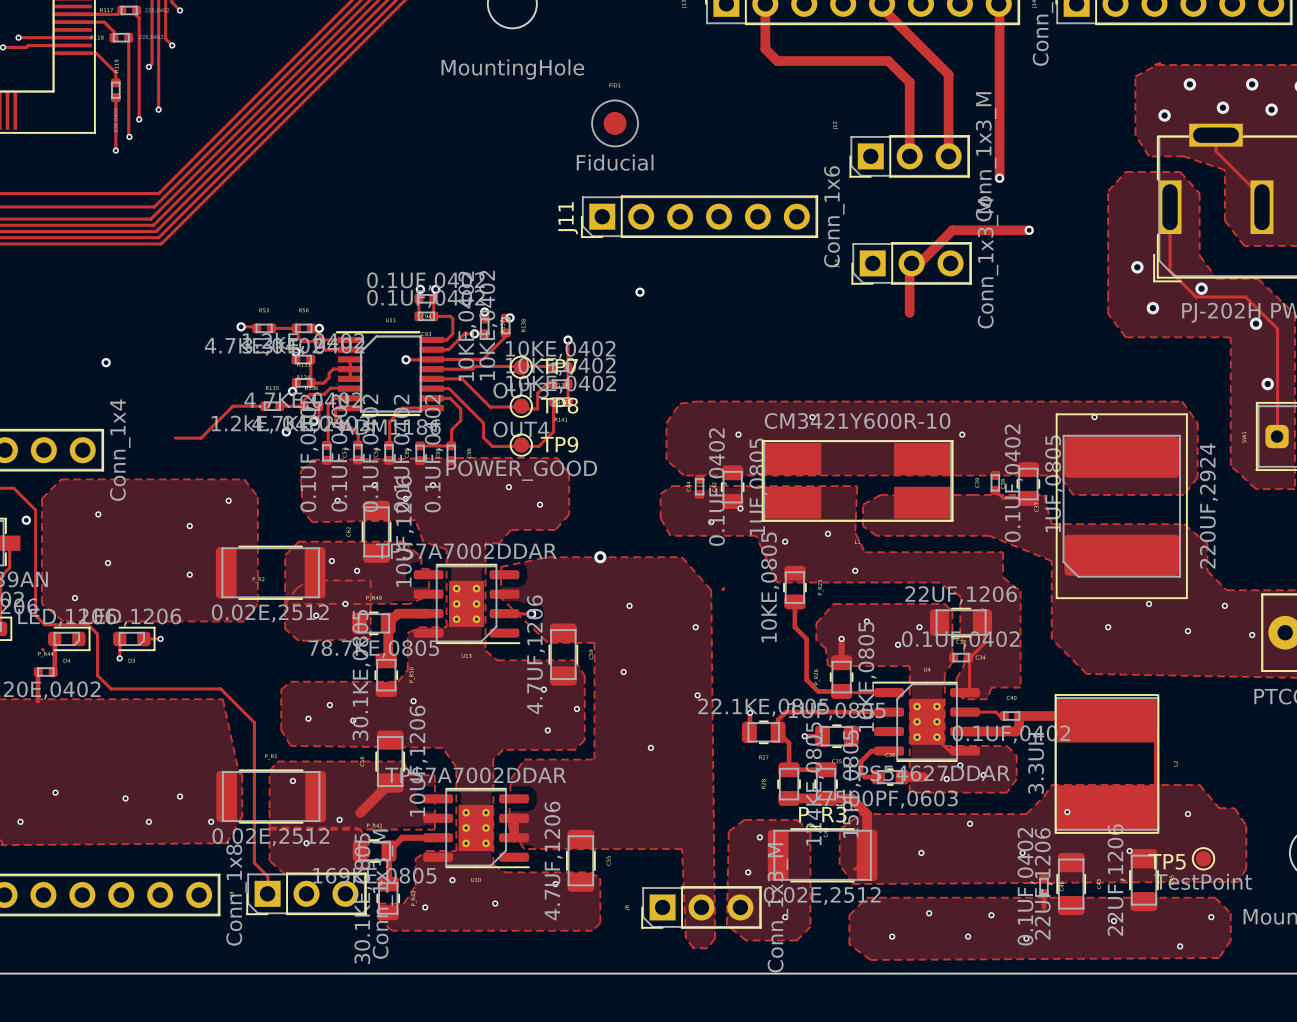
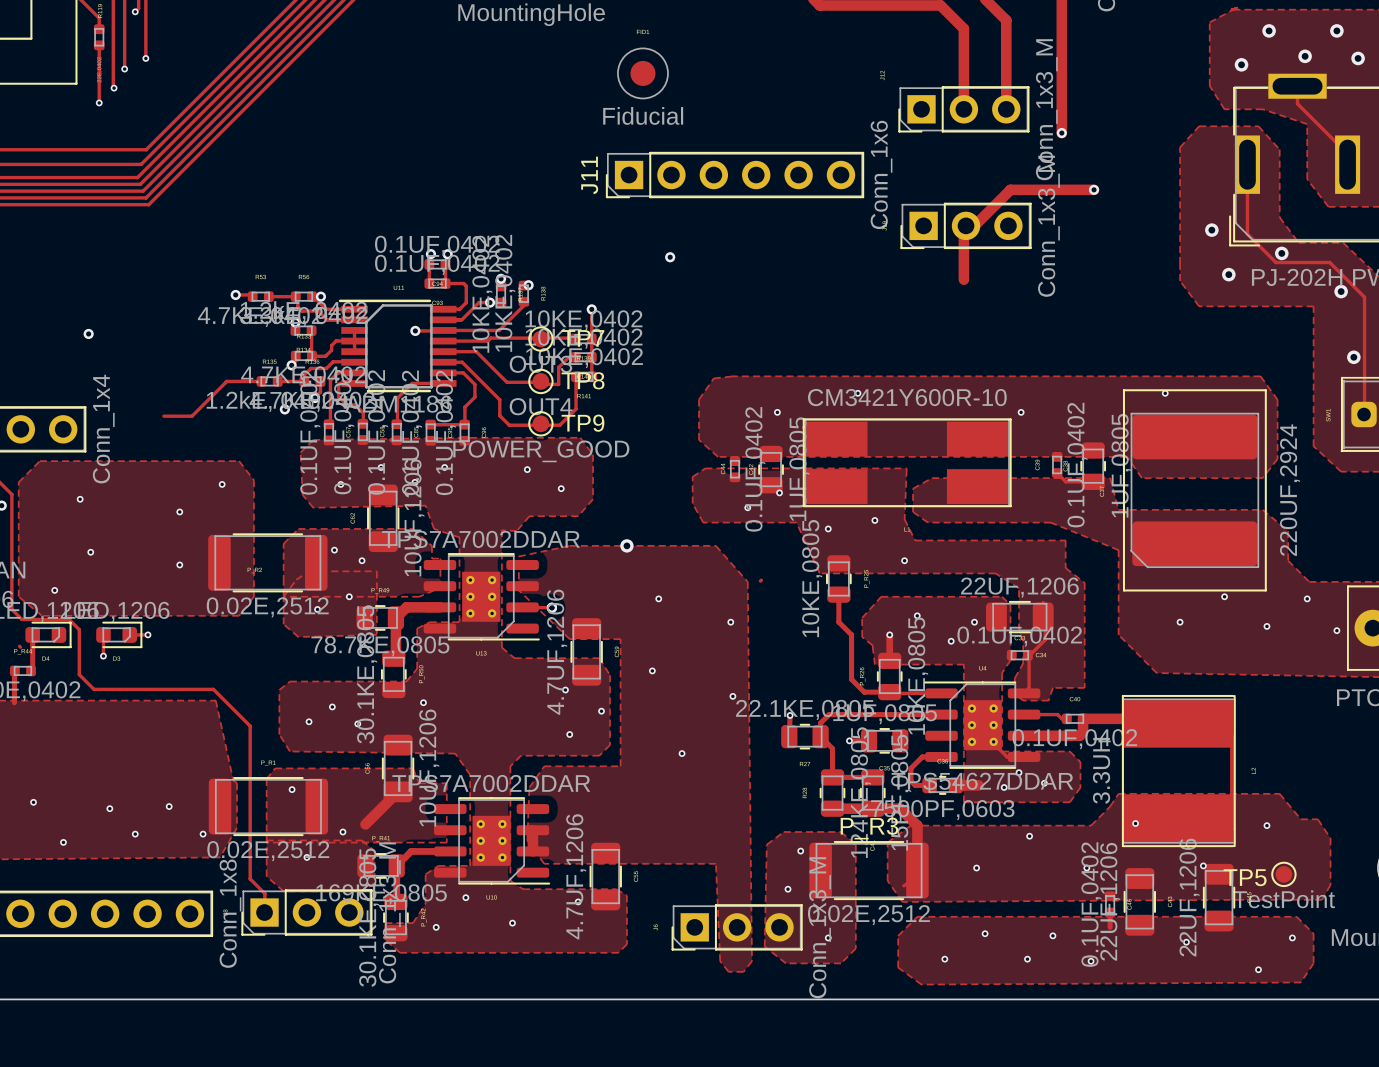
via: none -> (63, 842)

